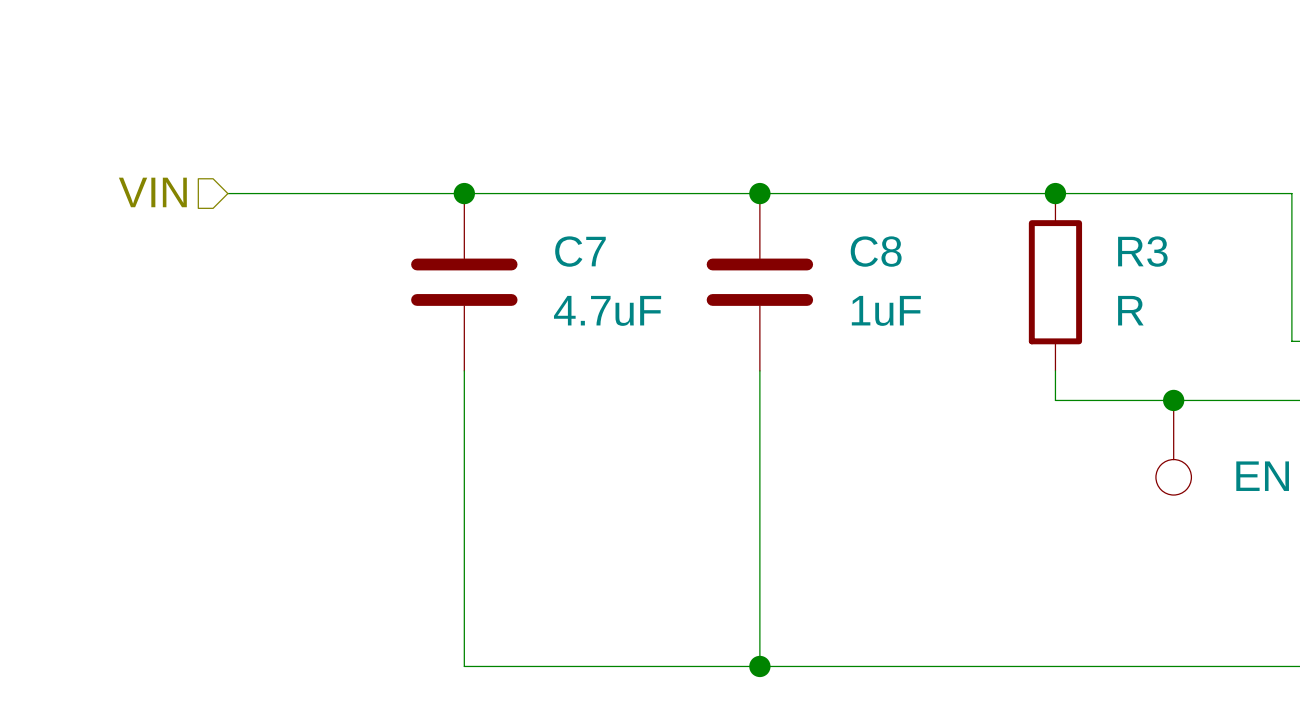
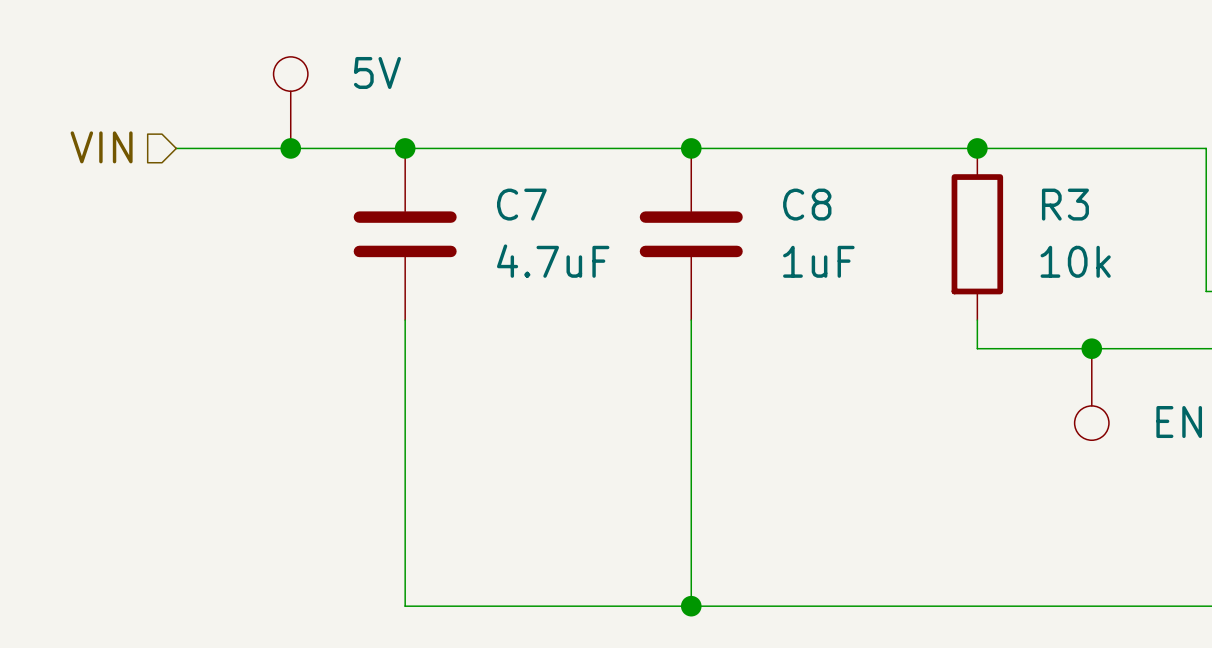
part: none -> (290, 102)
junction: none -> (290, 148)
R3 value: R (1130, 310) -> 10k (1075, 261)

